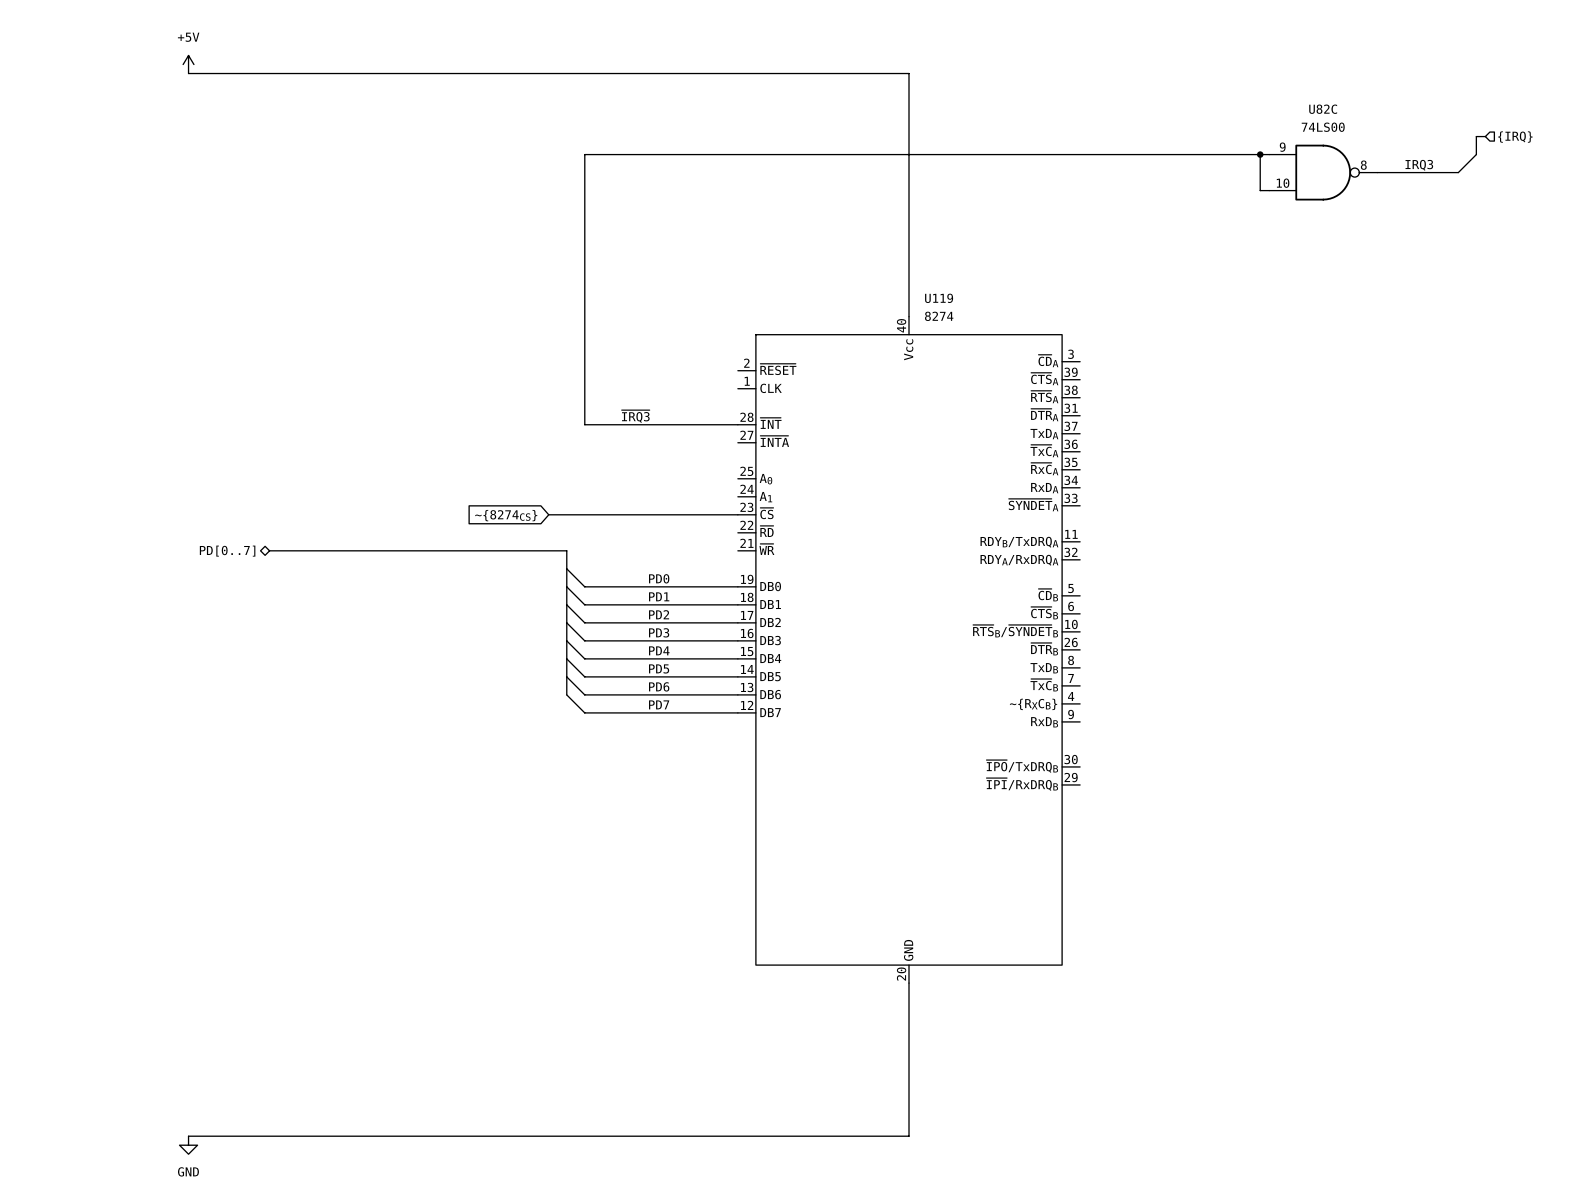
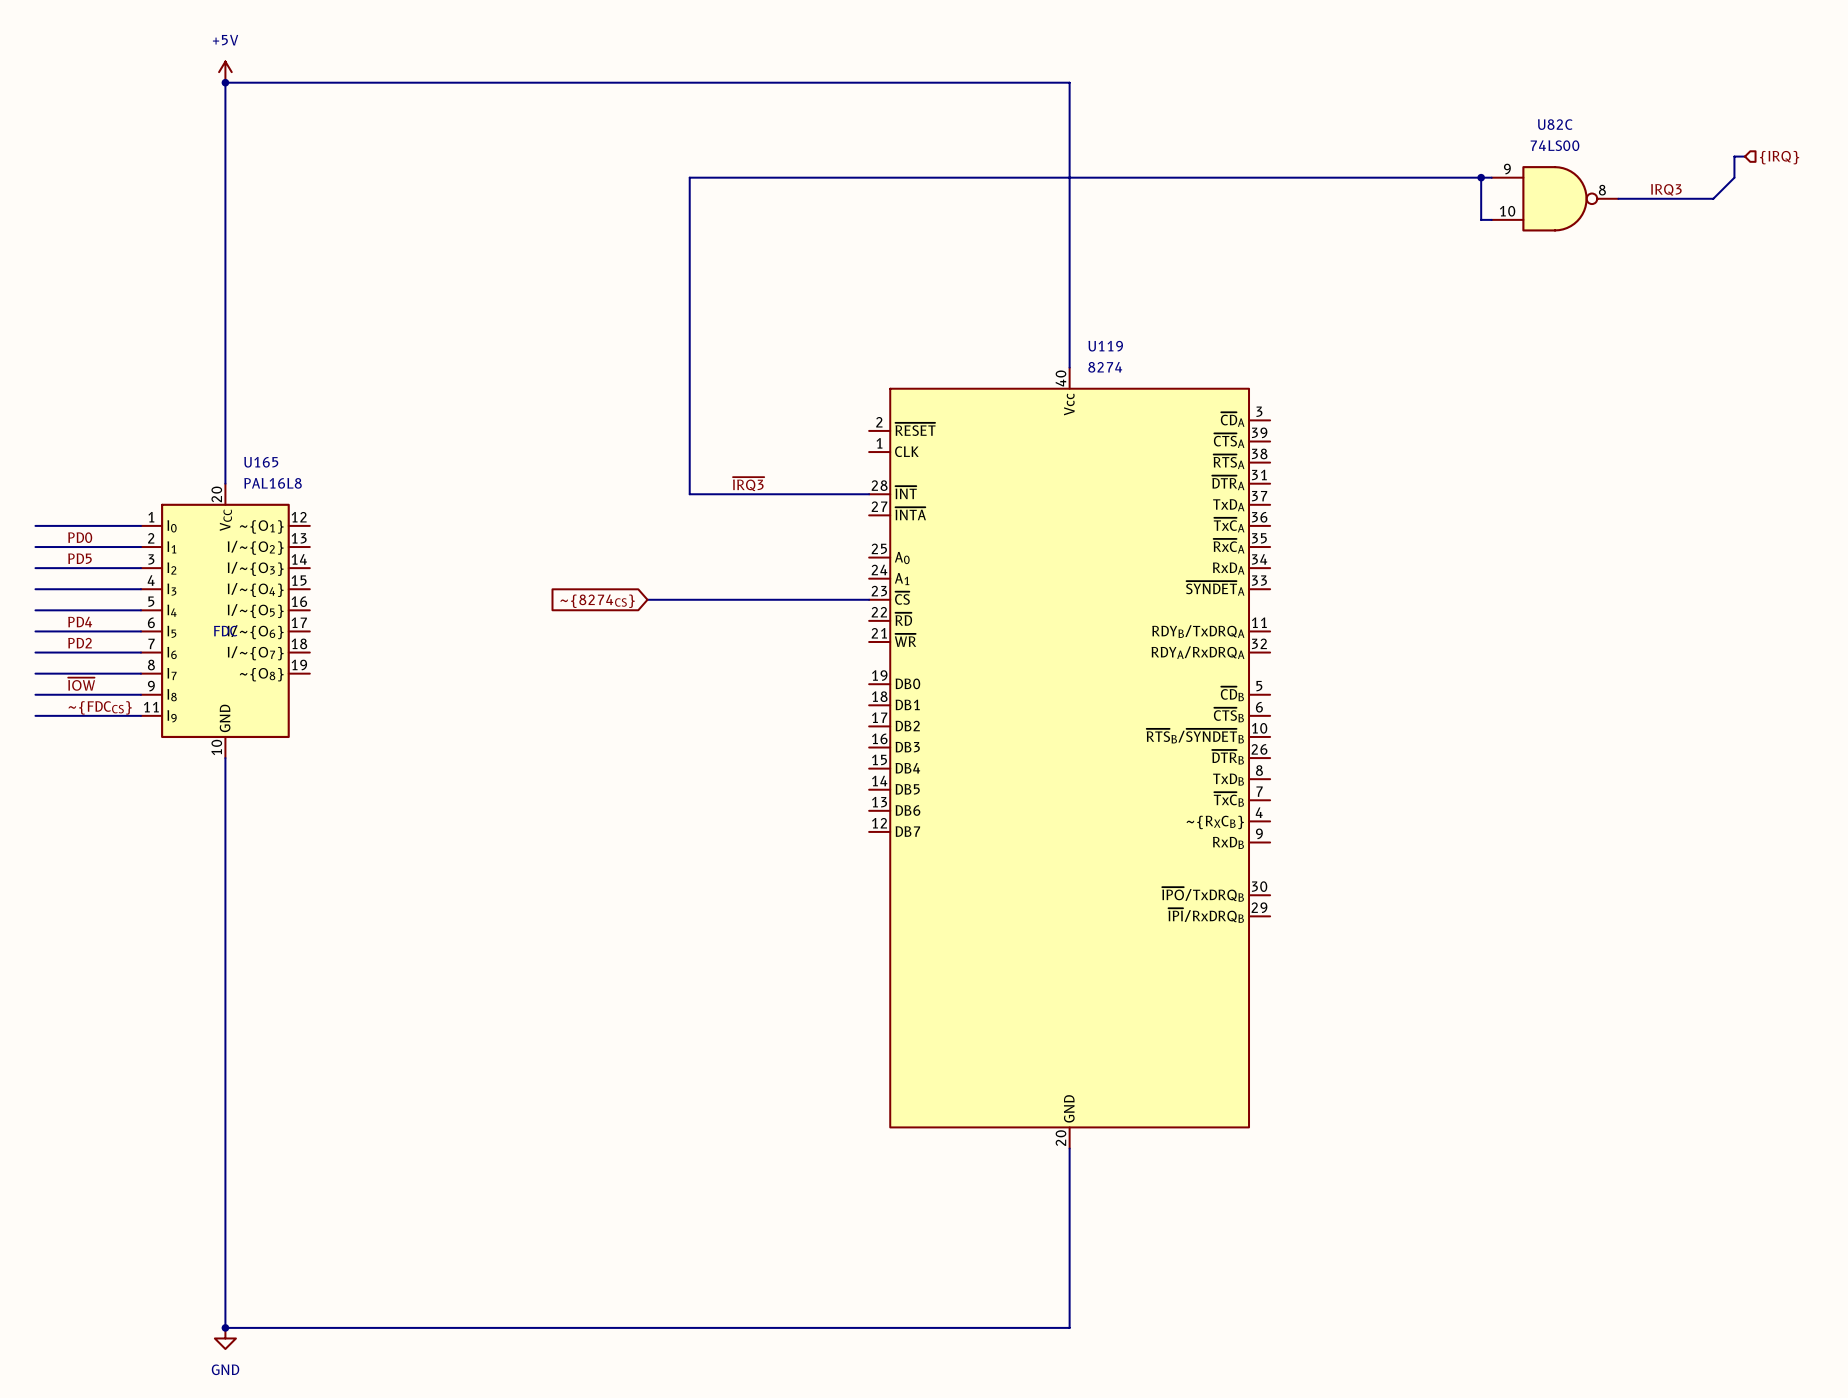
wire: none -> (225, 82) (225, 483)
junction: none -> (225, 82)
wire: none -> (35, 525) (140, 525)
label: none -> PD0 (80, 537)
wire: none -> (35, 547) (140, 547)
label: none -> PD5 (79, 558)
wire: none -> (35, 568) (140, 568)
wire: none -> (35, 589) (140, 589)
wire: none -> (35, 610) (140, 610)
U165: none -> PAL16L8 (225, 620)
label: none -> PD4 (80, 622)
wire: none -> (35, 631) (140, 631)
bus: (269, 550) (566, 550) (566, 694) -> none
label: none -> PD2 (80, 643)
hierarchical label: PD[0..7] (227, 551) -> none
wire: none -> (35, 652) (140, 652)
wire: (566, 568) (584, 586) (737, 586) -> none
wire: none -> (35, 673) (140, 673)
label: PD0 (659, 578) -> none
label: none -> ~{IOW} (81, 684)
wire: (566, 586) (584, 604) (737, 604) -> none
wire: none -> (35, 694) (140, 694)
label: PD1 (659, 596) -> none
wire: (566, 604) (584, 622) (737, 622) -> none
label: none -> ~{FDCCS} (100, 707)
wire: none -> (35, 715) (140, 715)
label: PD2 (659, 614) -> none
wire: (566, 622) (584, 640) (737, 640) -> none
label: PD3 (659, 632) -> none
wire: (566, 640) (584, 658) (737, 658) -> none
wire: none -> (225, 758) (225, 1327)
label: PD4 (659, 650) -> none
wire: (566, 658) (584, 676) (737, 676) -> none
label: PD5 (659, 668) -> none
wire: (566, 676) (584, 694) (737, 694) -> none
label: PD6 (659, 686) -> none
wire: (566, 694) (584, 712) (737, 712) -> none
label: PD7 (659, 704) -> none
junction: none -> (225, 1327)

